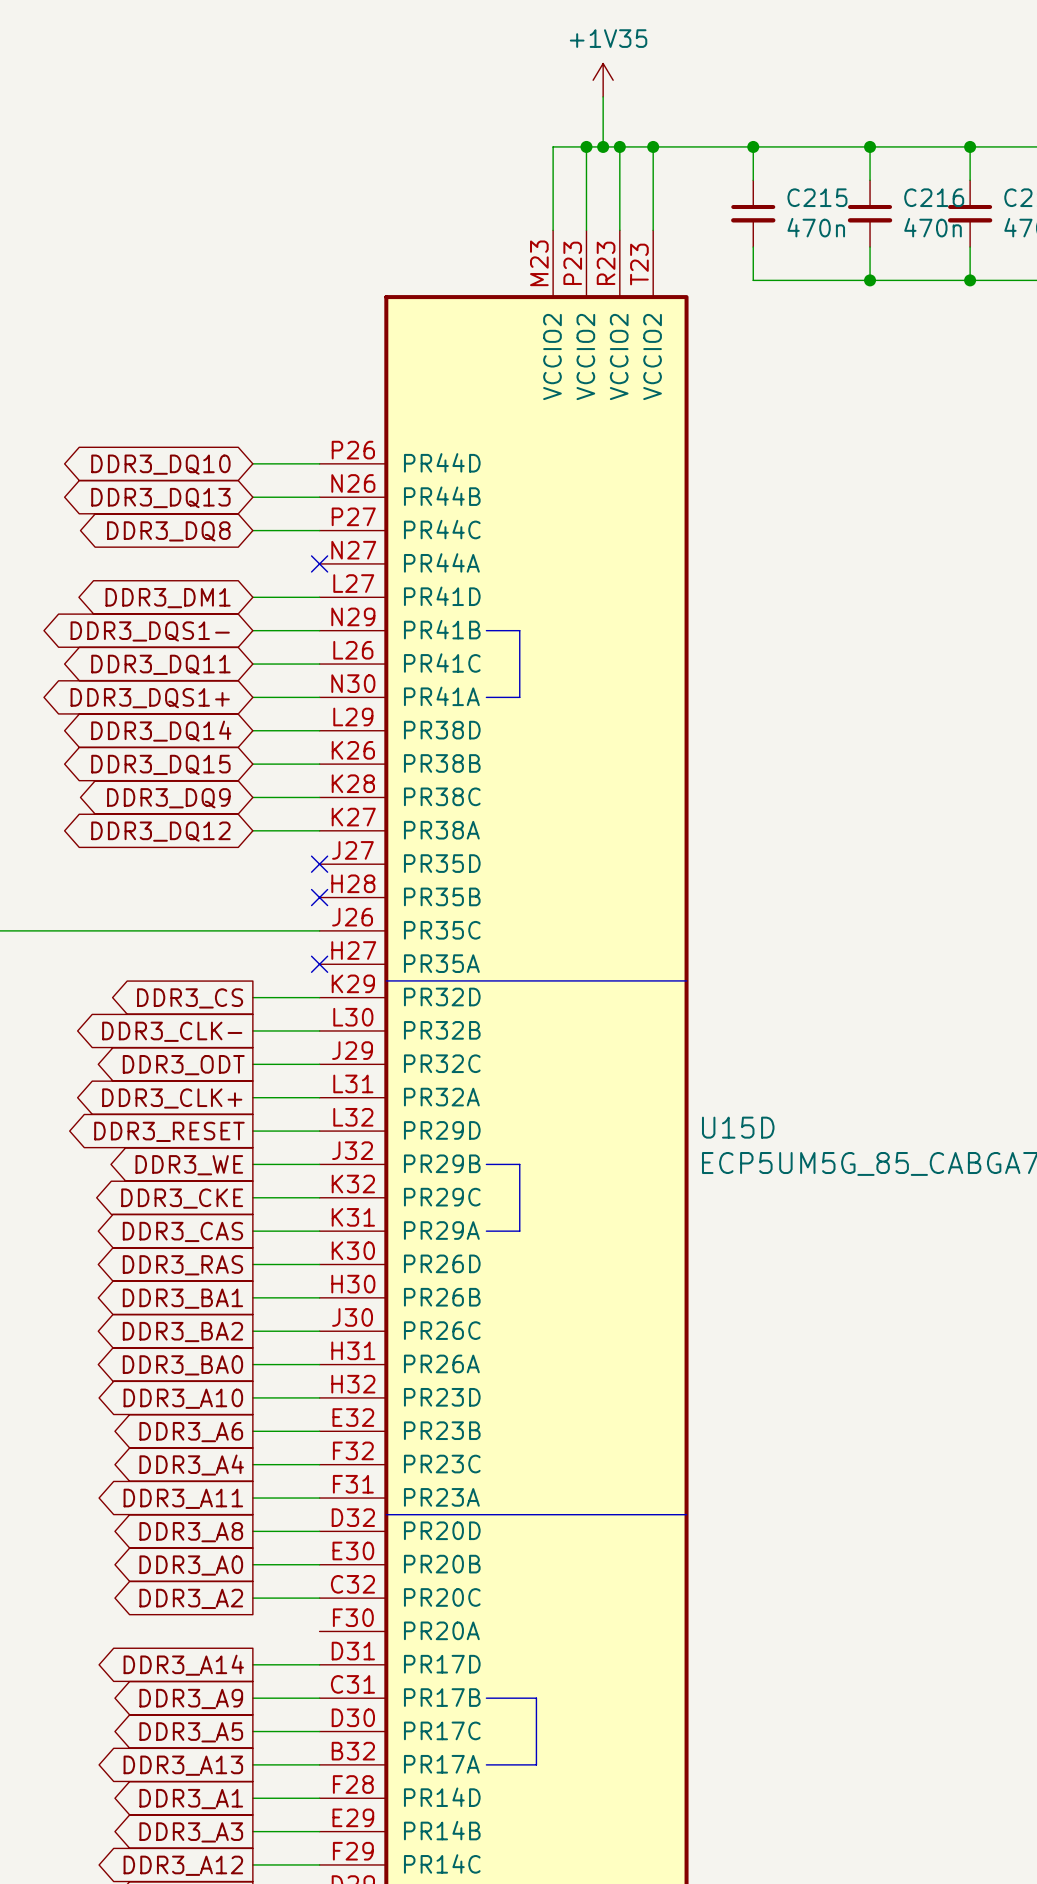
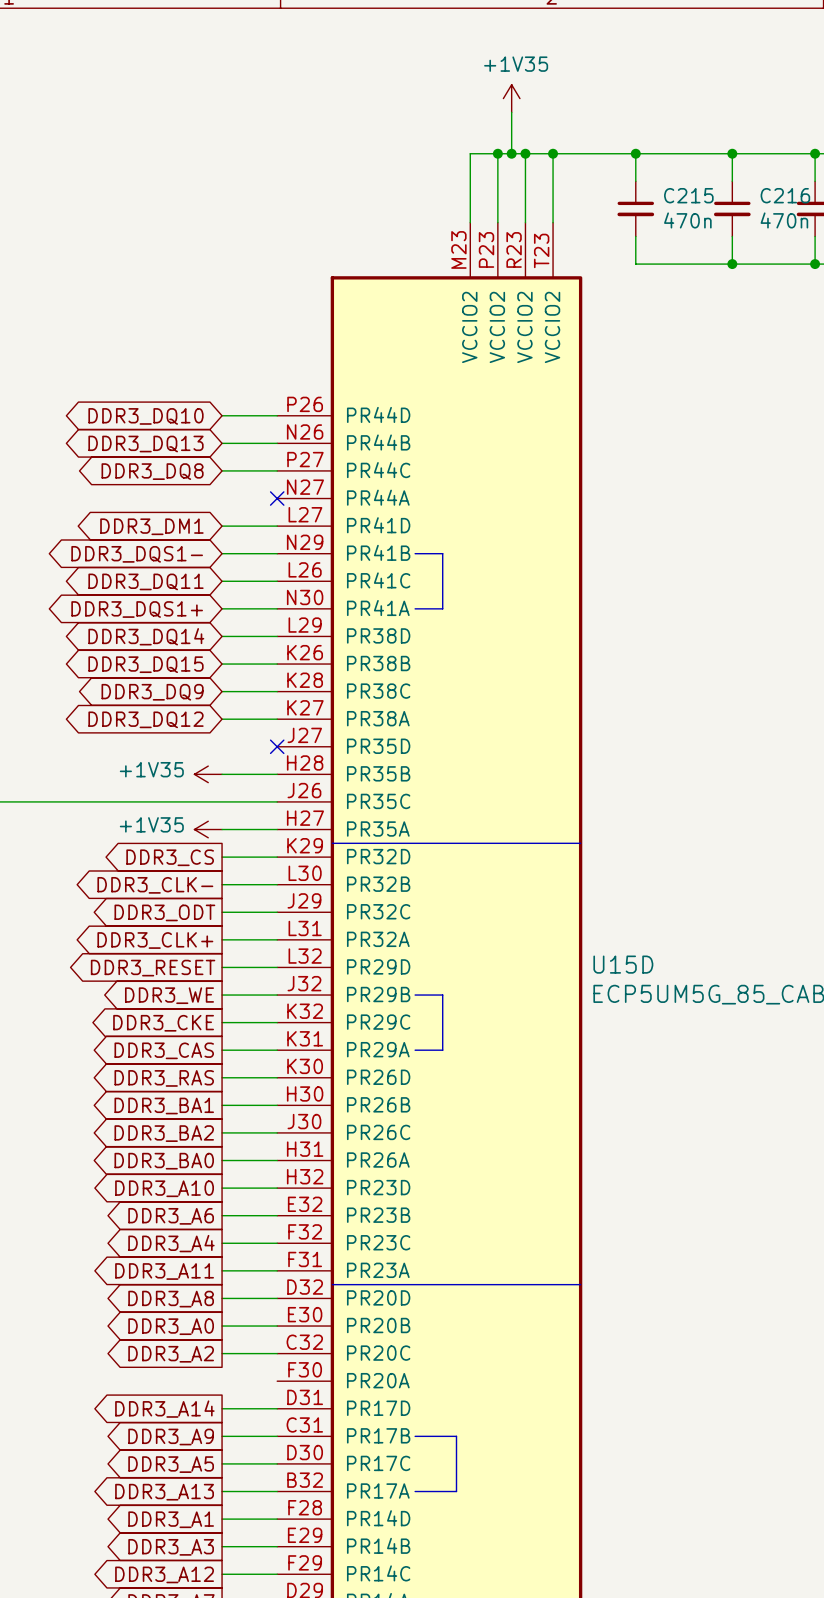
power symbol: none -> +1V35 (208, 774)
wire: none -> (222, 774) (277, 774)
no-connect mark: (319, 897) -> none
power symbol: none -> +1V35 (208, 829)
wire: none -> (222, 829) (277, 829)
no-connect mark: (319, 964) -> none

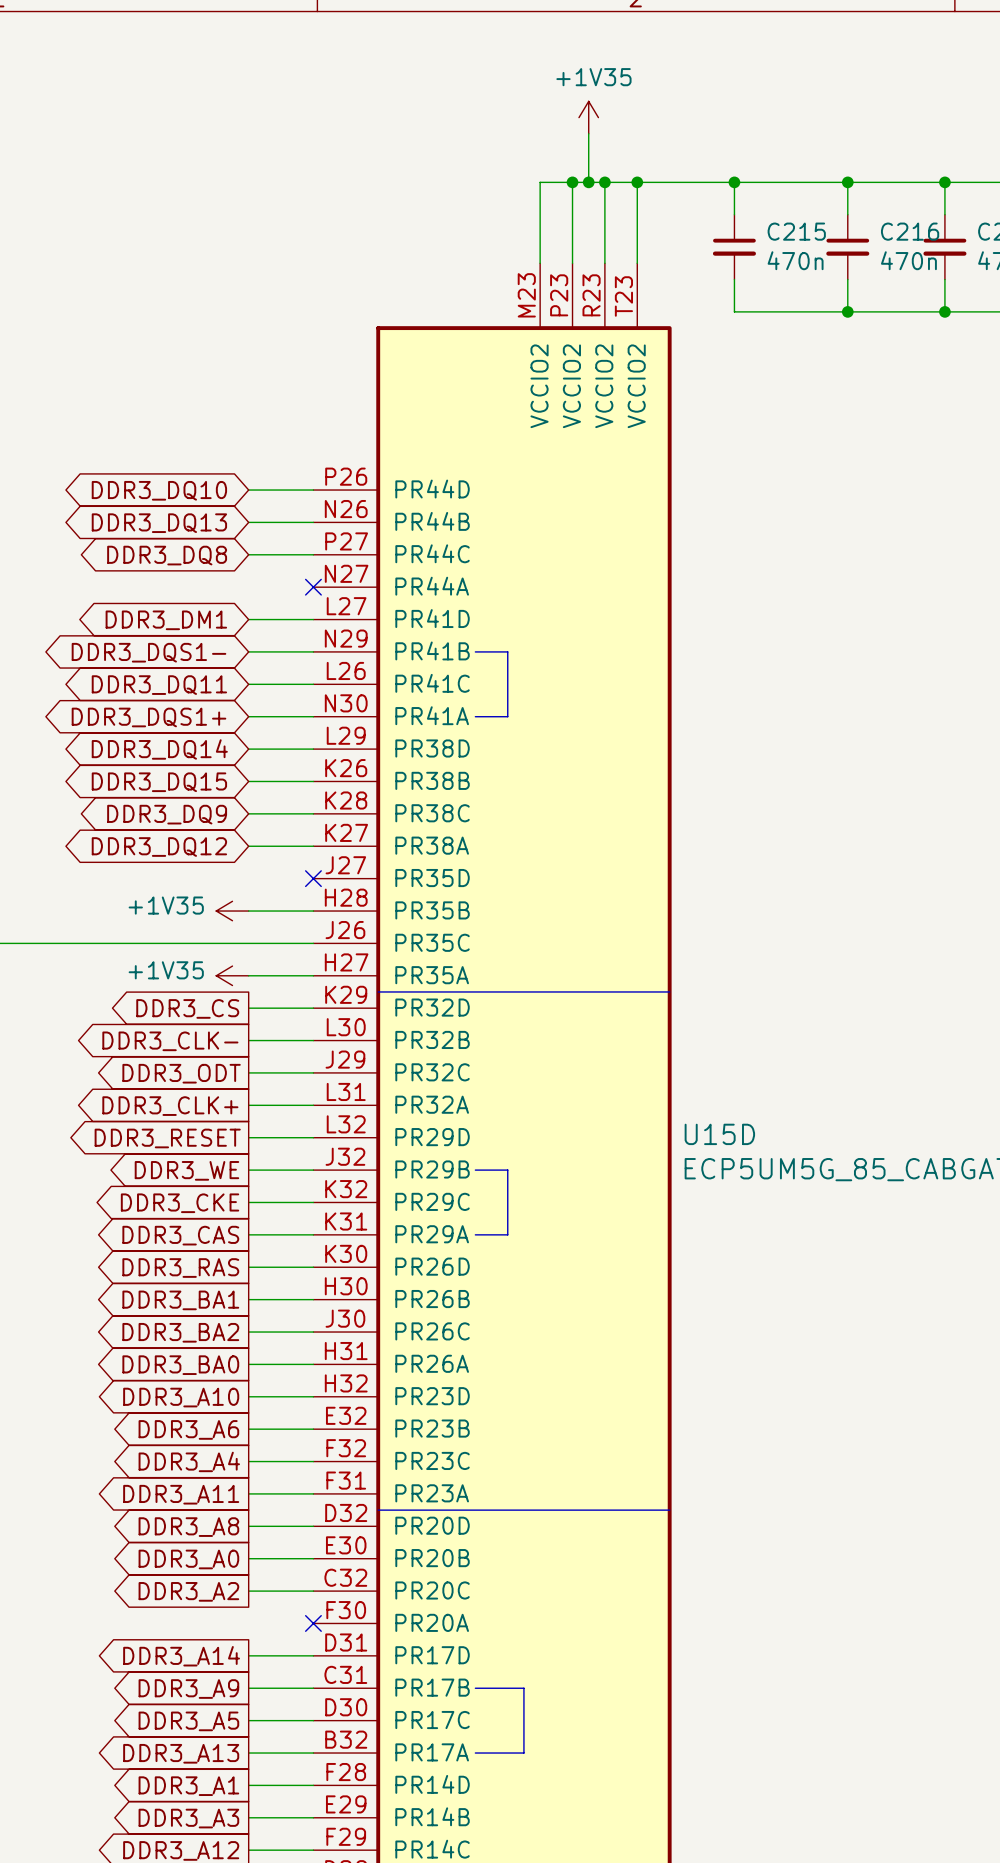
no-connect mark: none -> (313, 1623)

